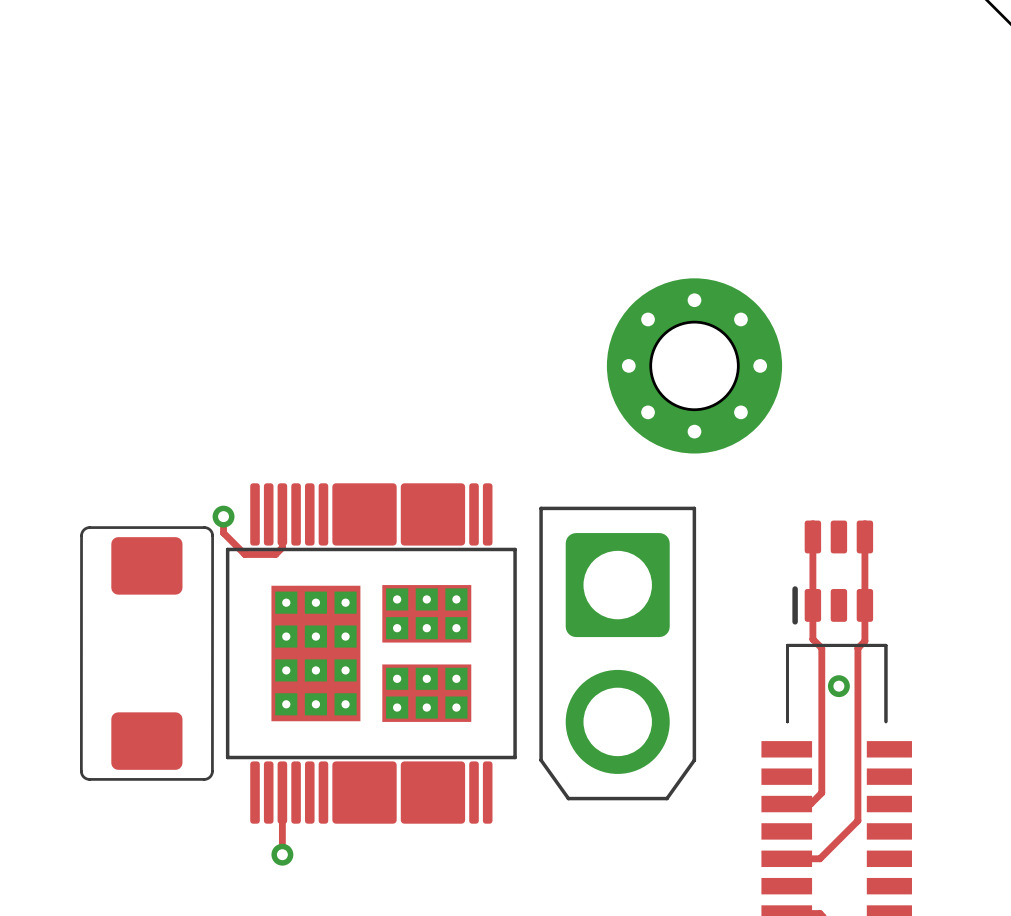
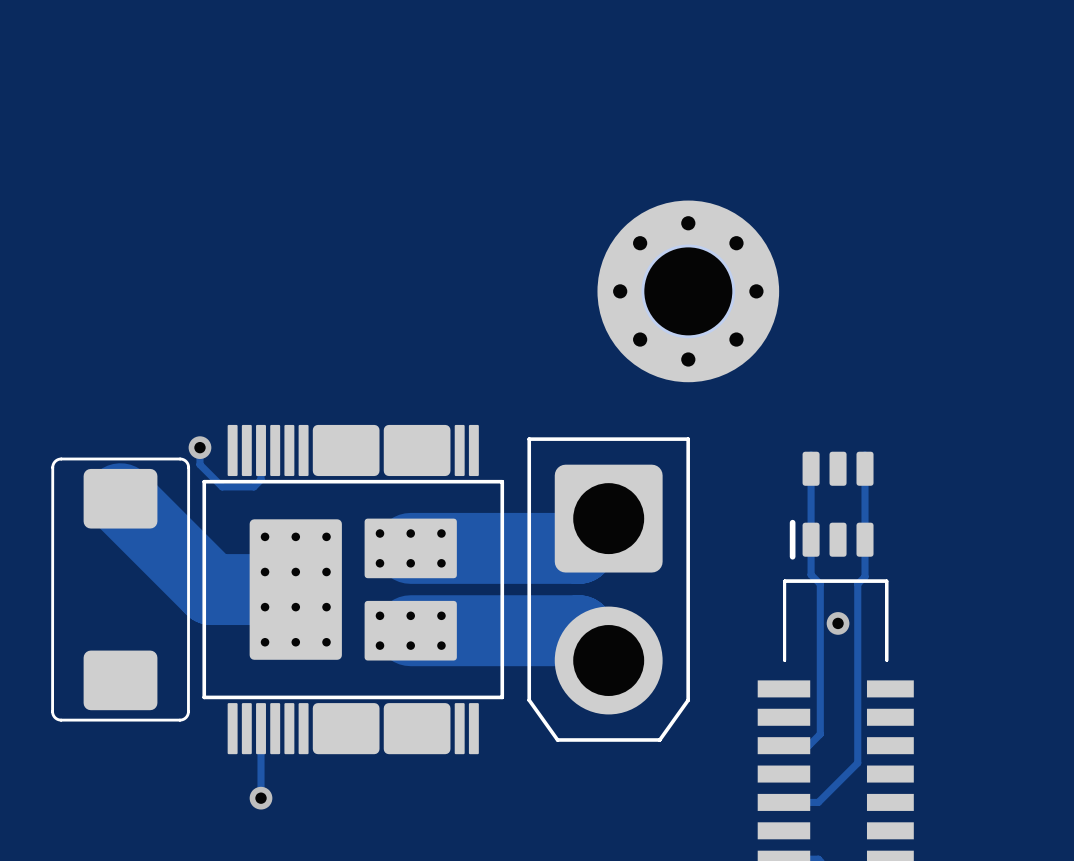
part footprint: [225, 483, 517, 824] -> [202, 424, 505, 755]
track: none -> (120, 498) (211, 589) (295, 589)
track: none -> (608, 518) (578, 548) (410, 548)
track: none -> (410, 630) (578, 630) (608, 660)

